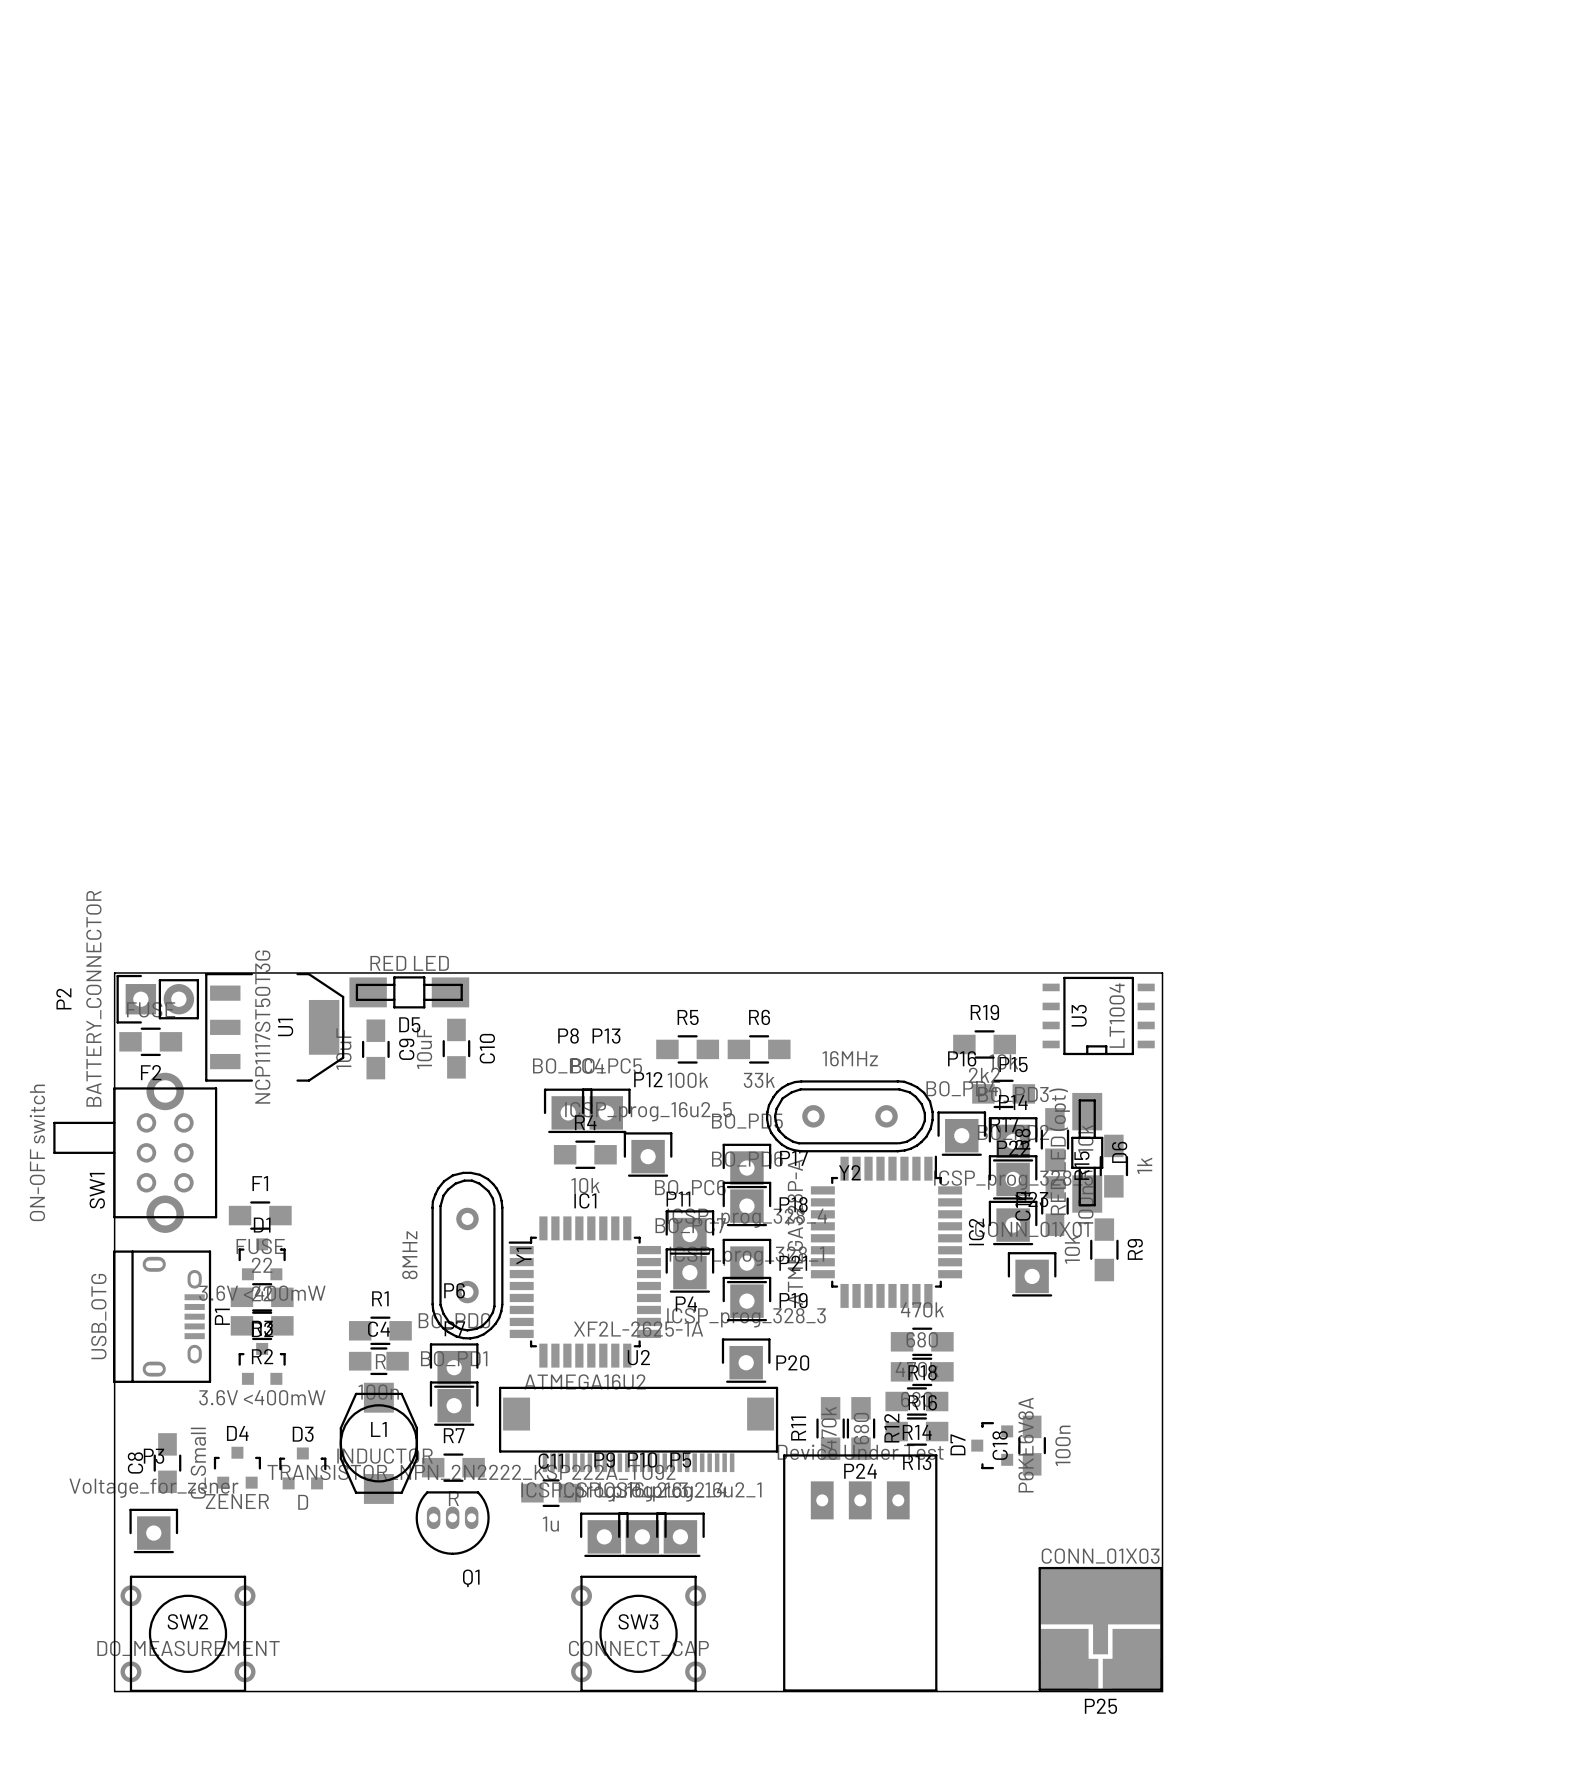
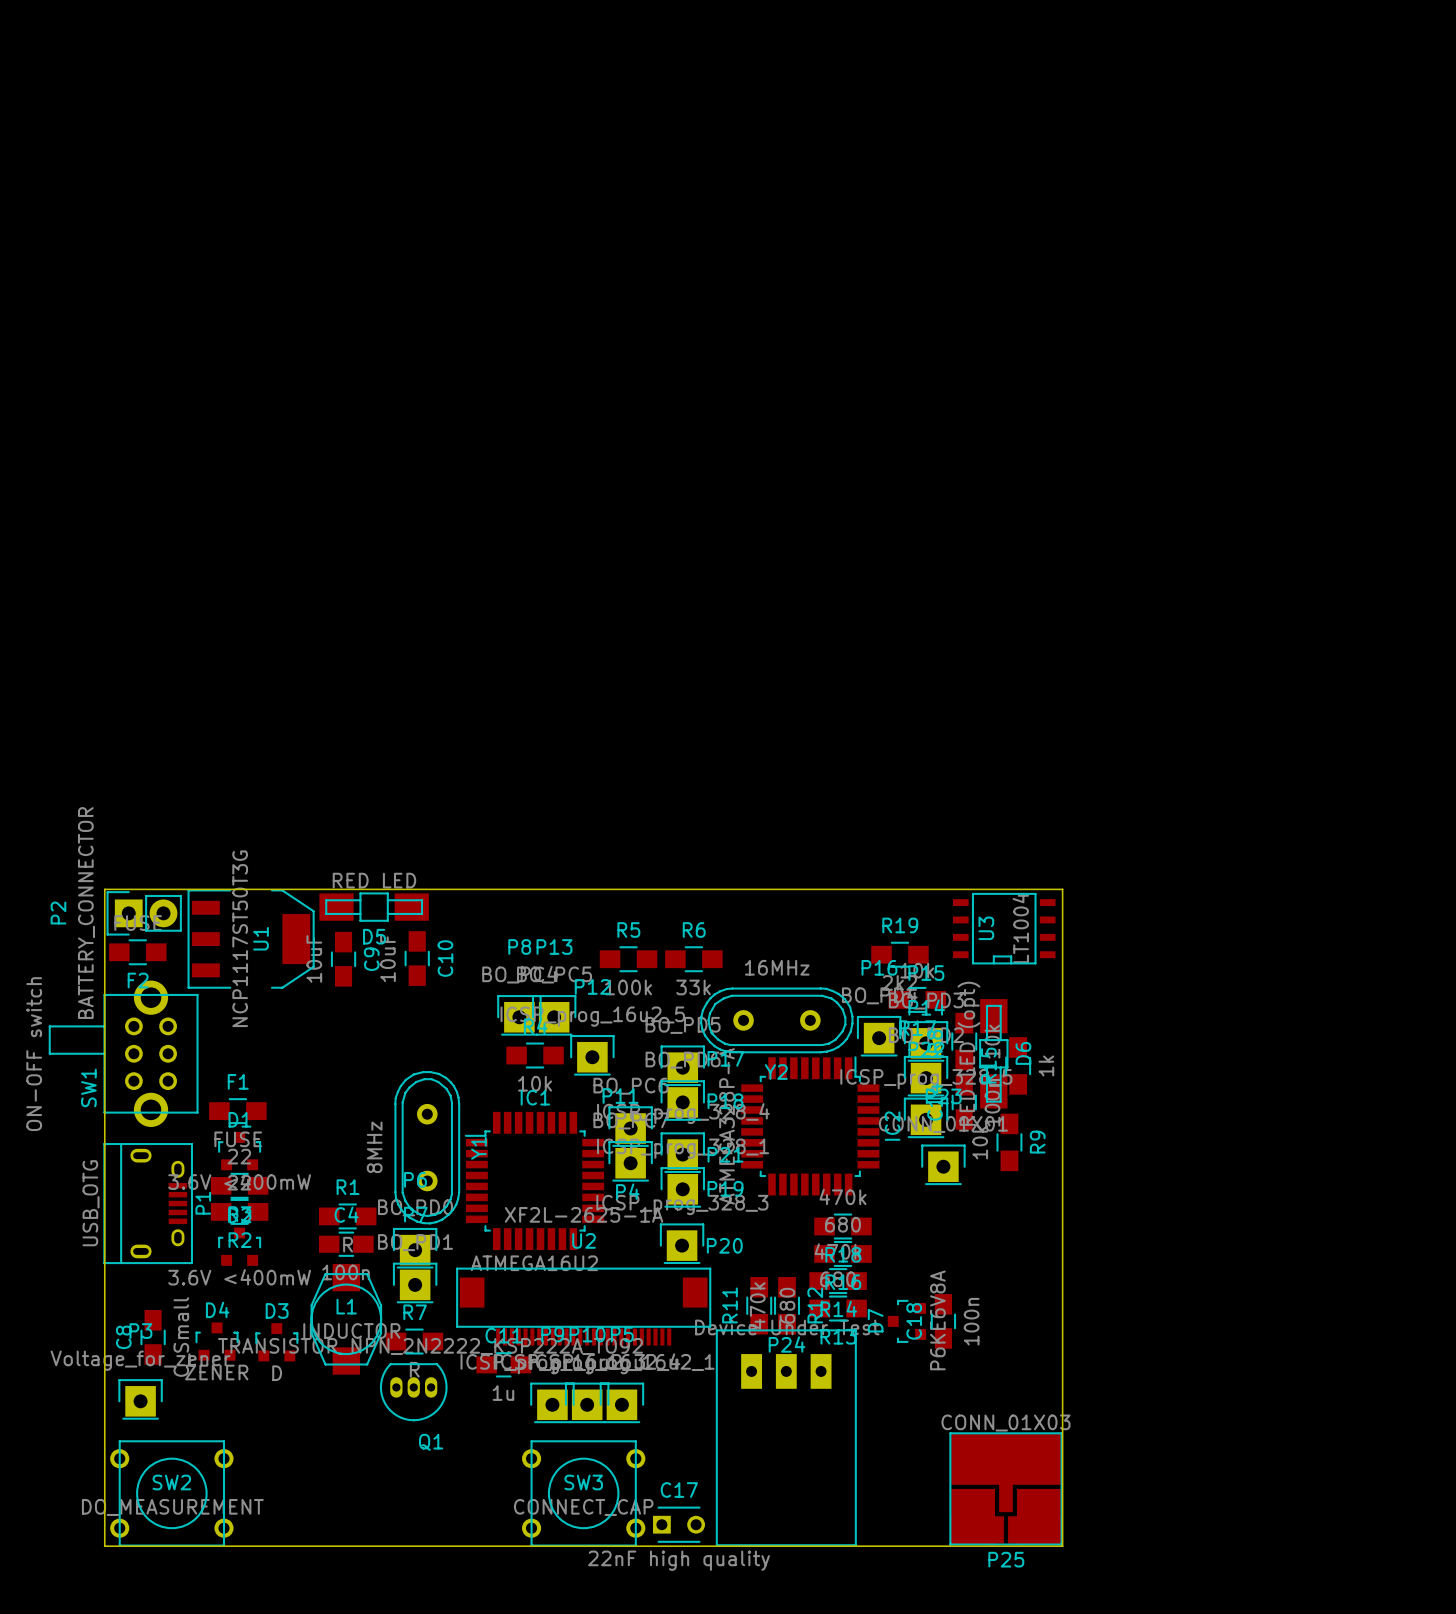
C17: none -> 22nF high quality (679, 1524)

